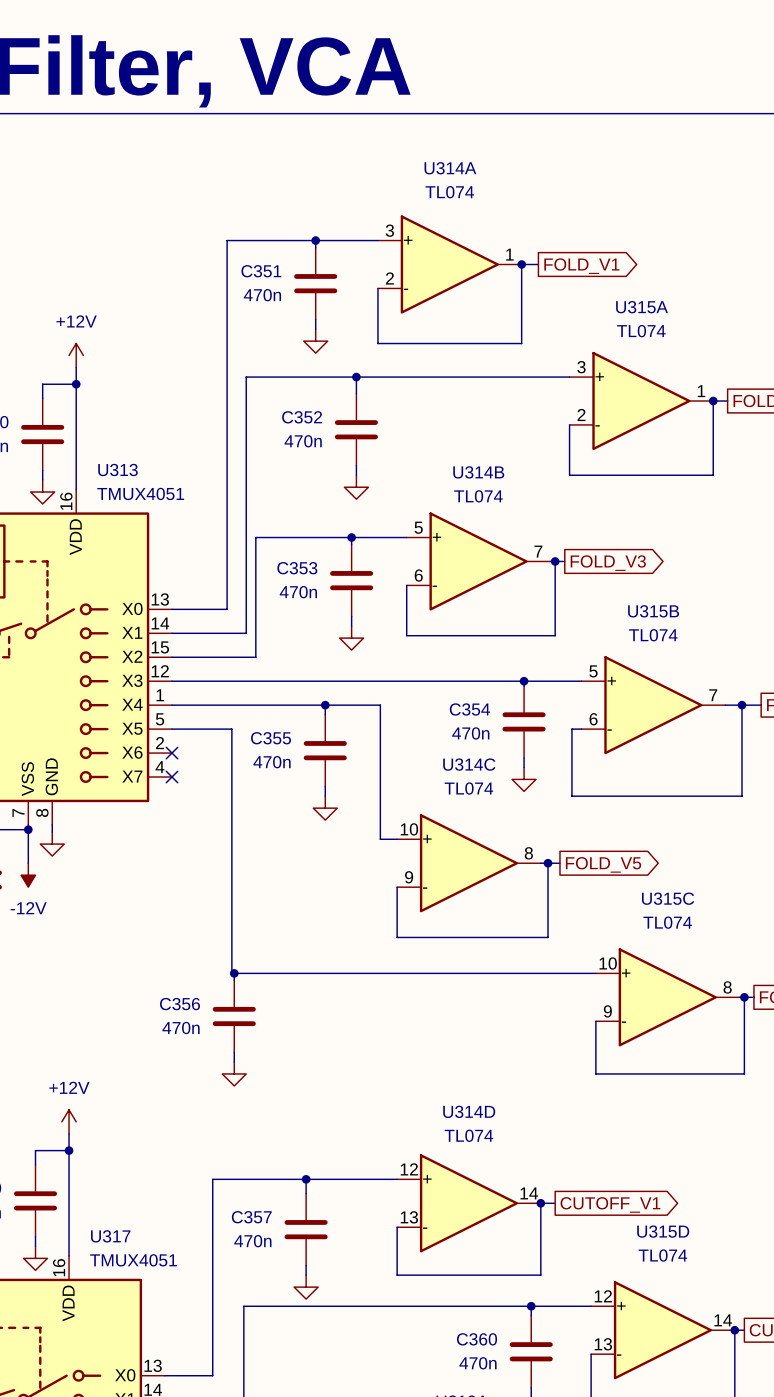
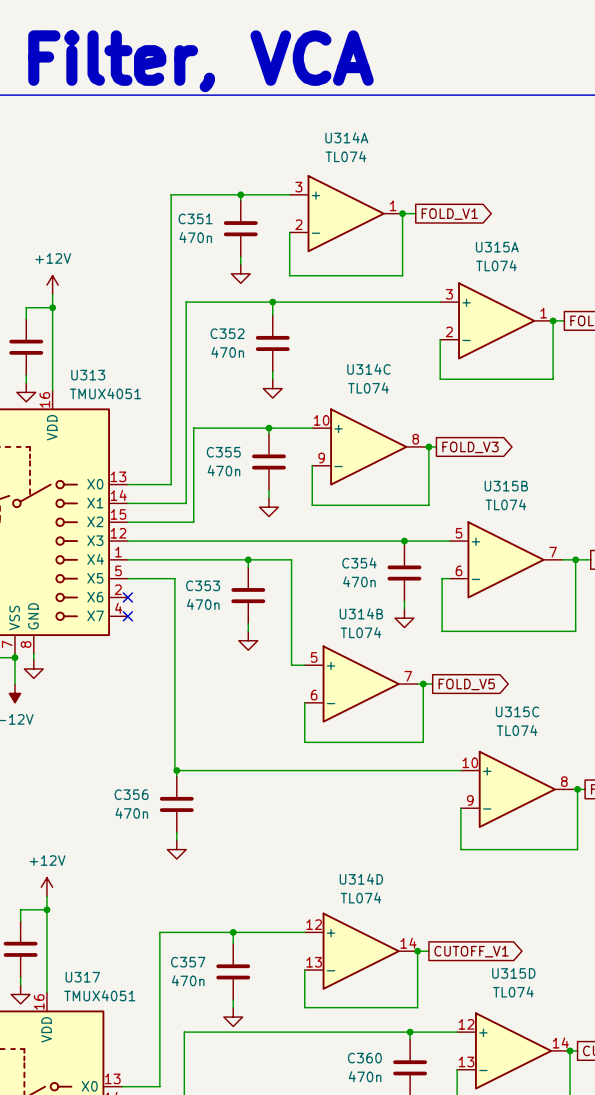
U314B position: (478, 561) -> (361, 684)
C353 name: C353 (297, 568) -> C355 (223, 452)
C355 name: C355 (271, 738) -> C353 (203, 585)
U314C position: (468, 863) -> (368, 446)

